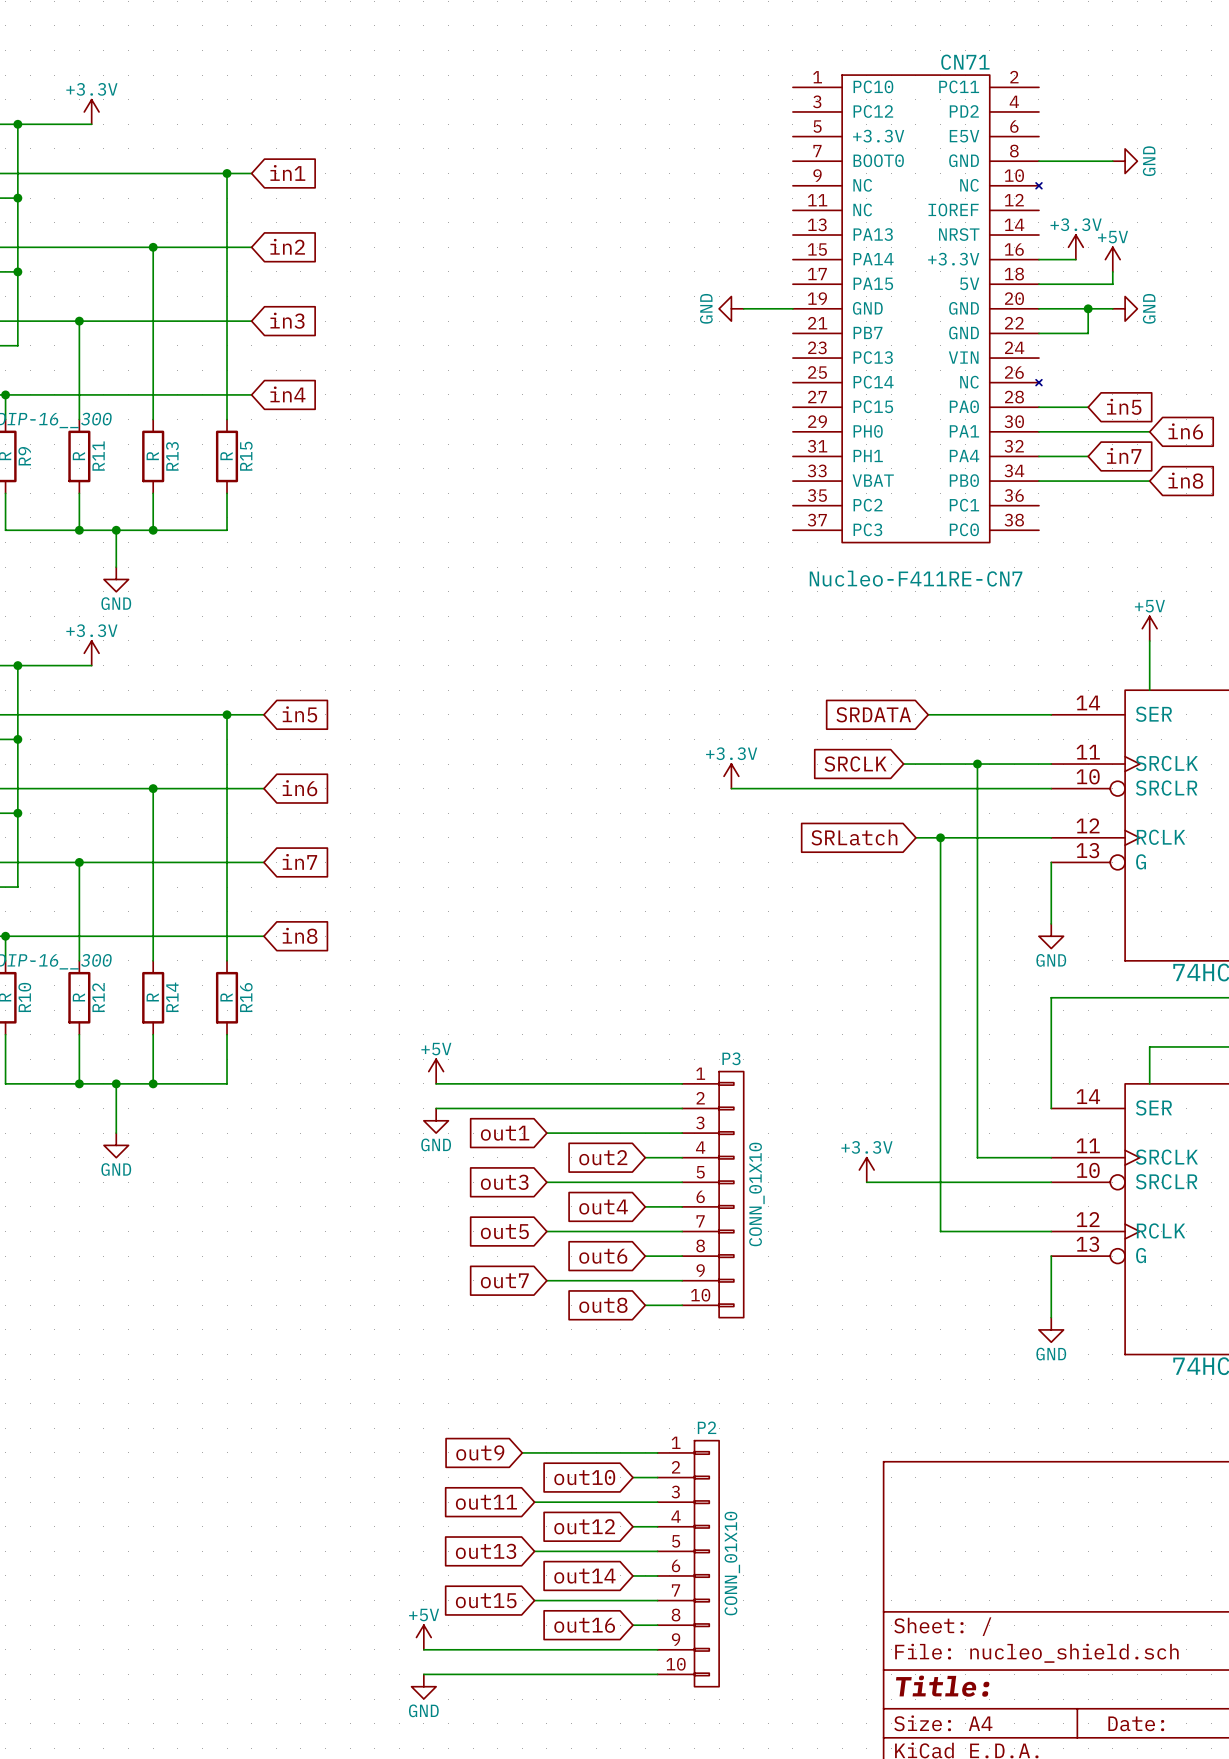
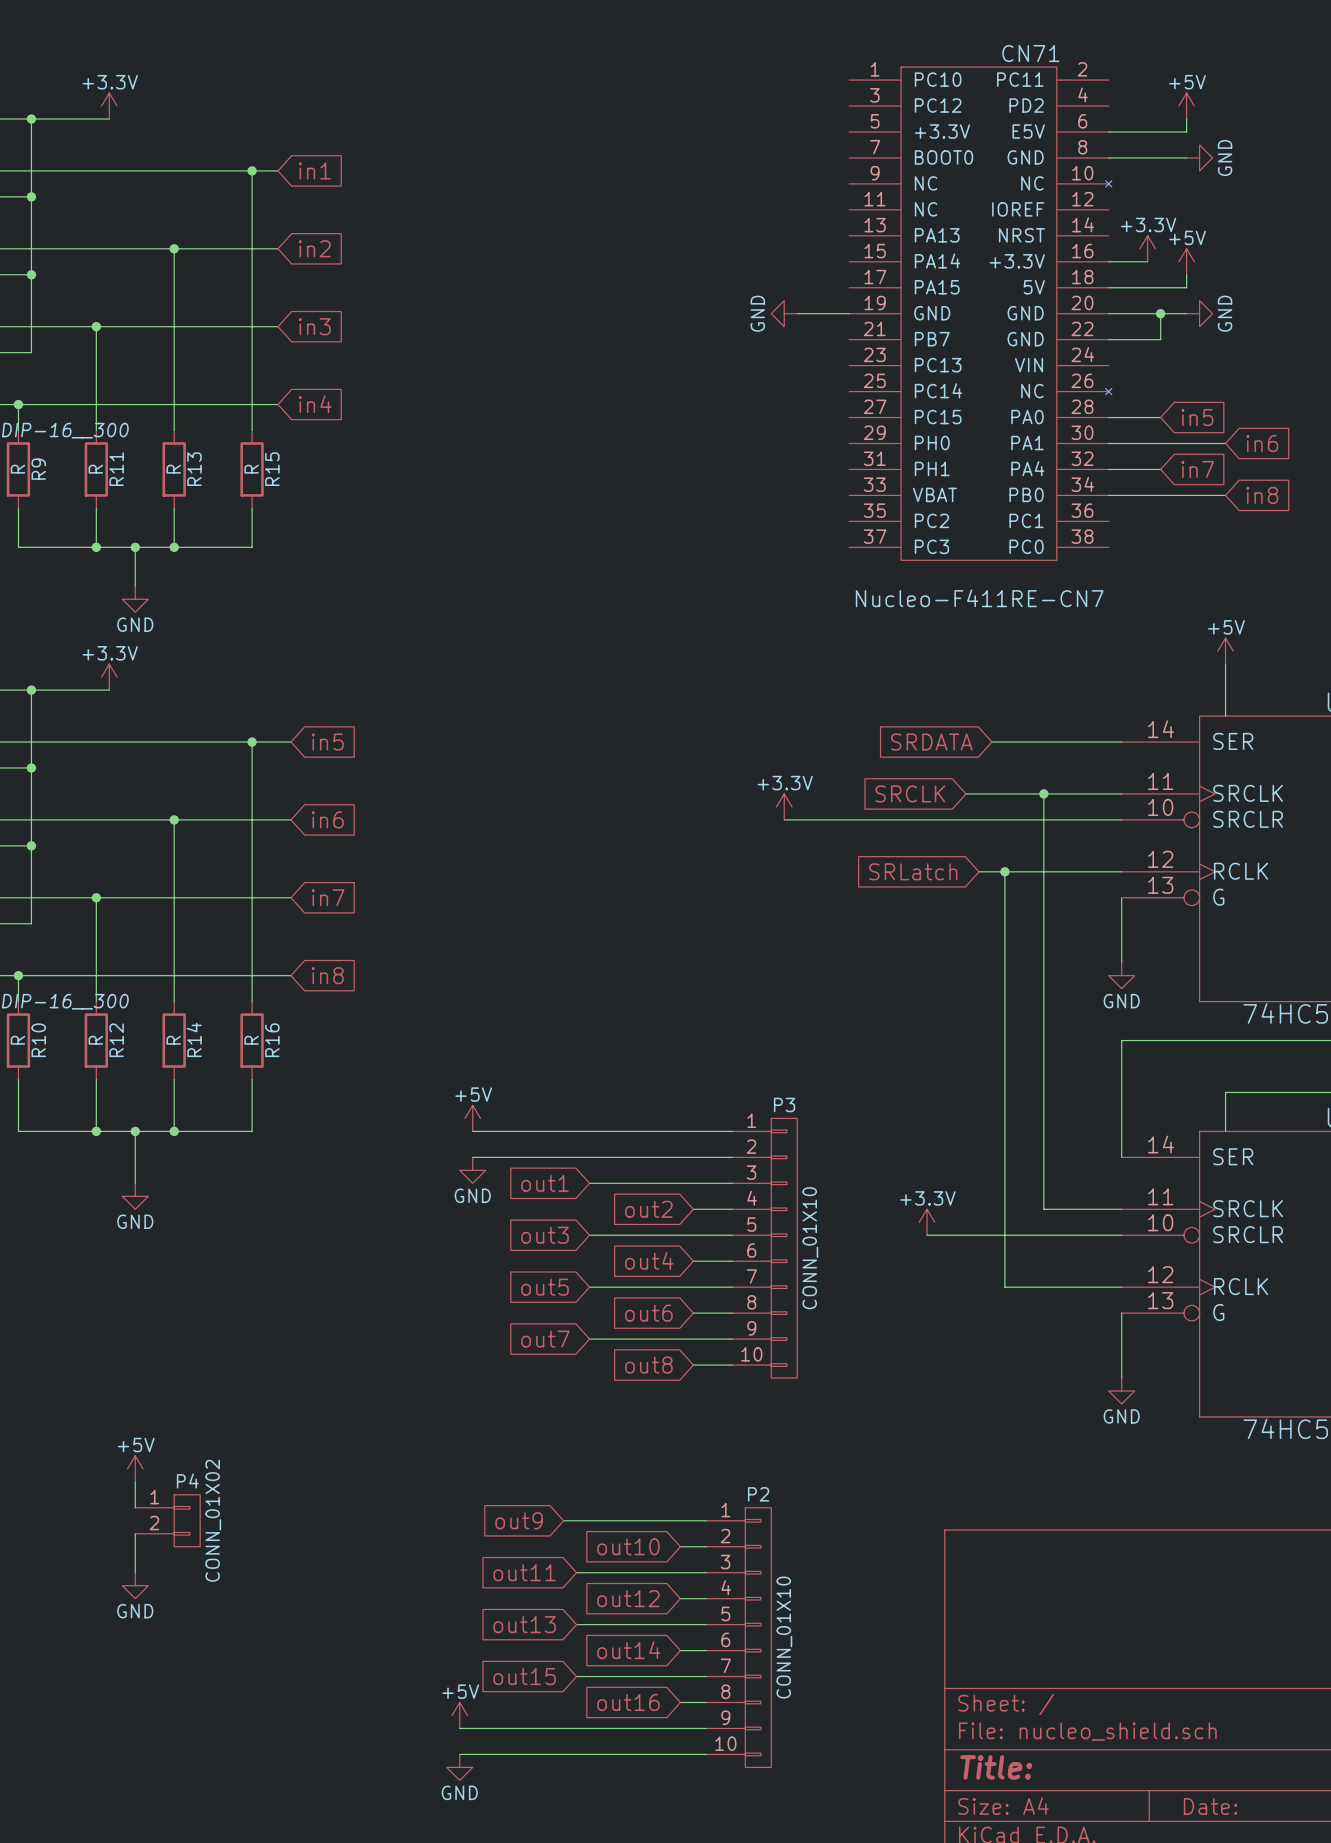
power symbol: none -> +5V (1186, 106)
wire: none -> (1186, 119) (1186, 131) (1108, 131)
power symbol: none -> +5V (135, 1468)
wire: none -> (135, 1481) (135, 1507)
P4: none -> CONN_01X02 (167, 1520)
wire: none -> (135, 1533) (135, 1572)
power symbol: none -> GND (135, 1585)

